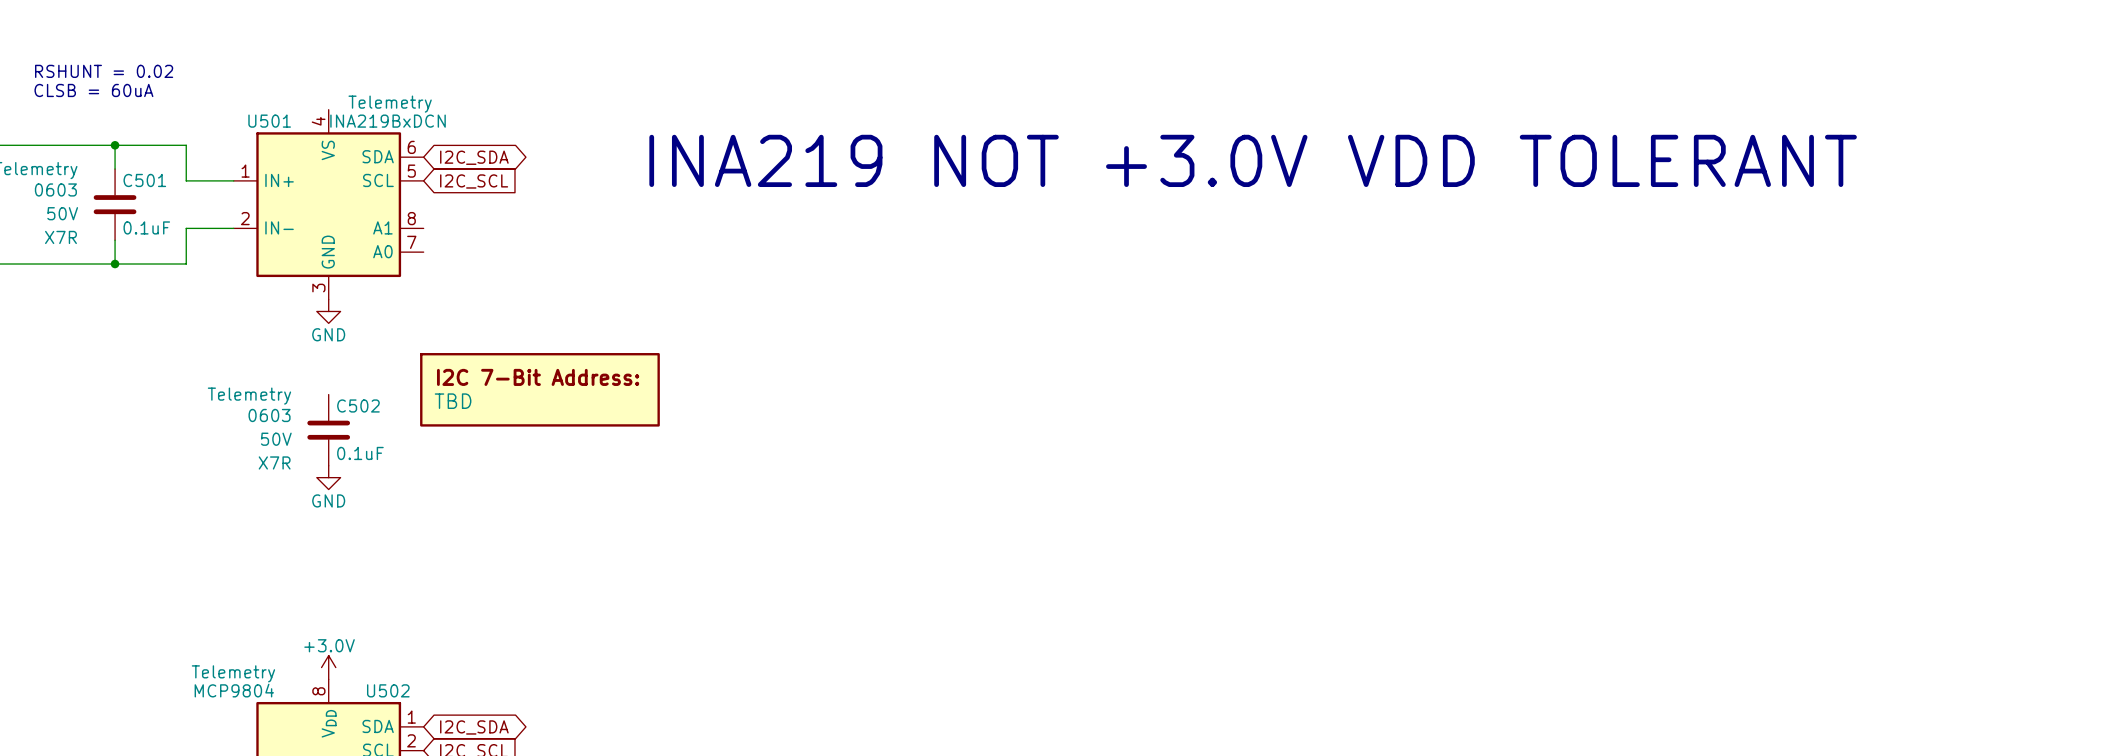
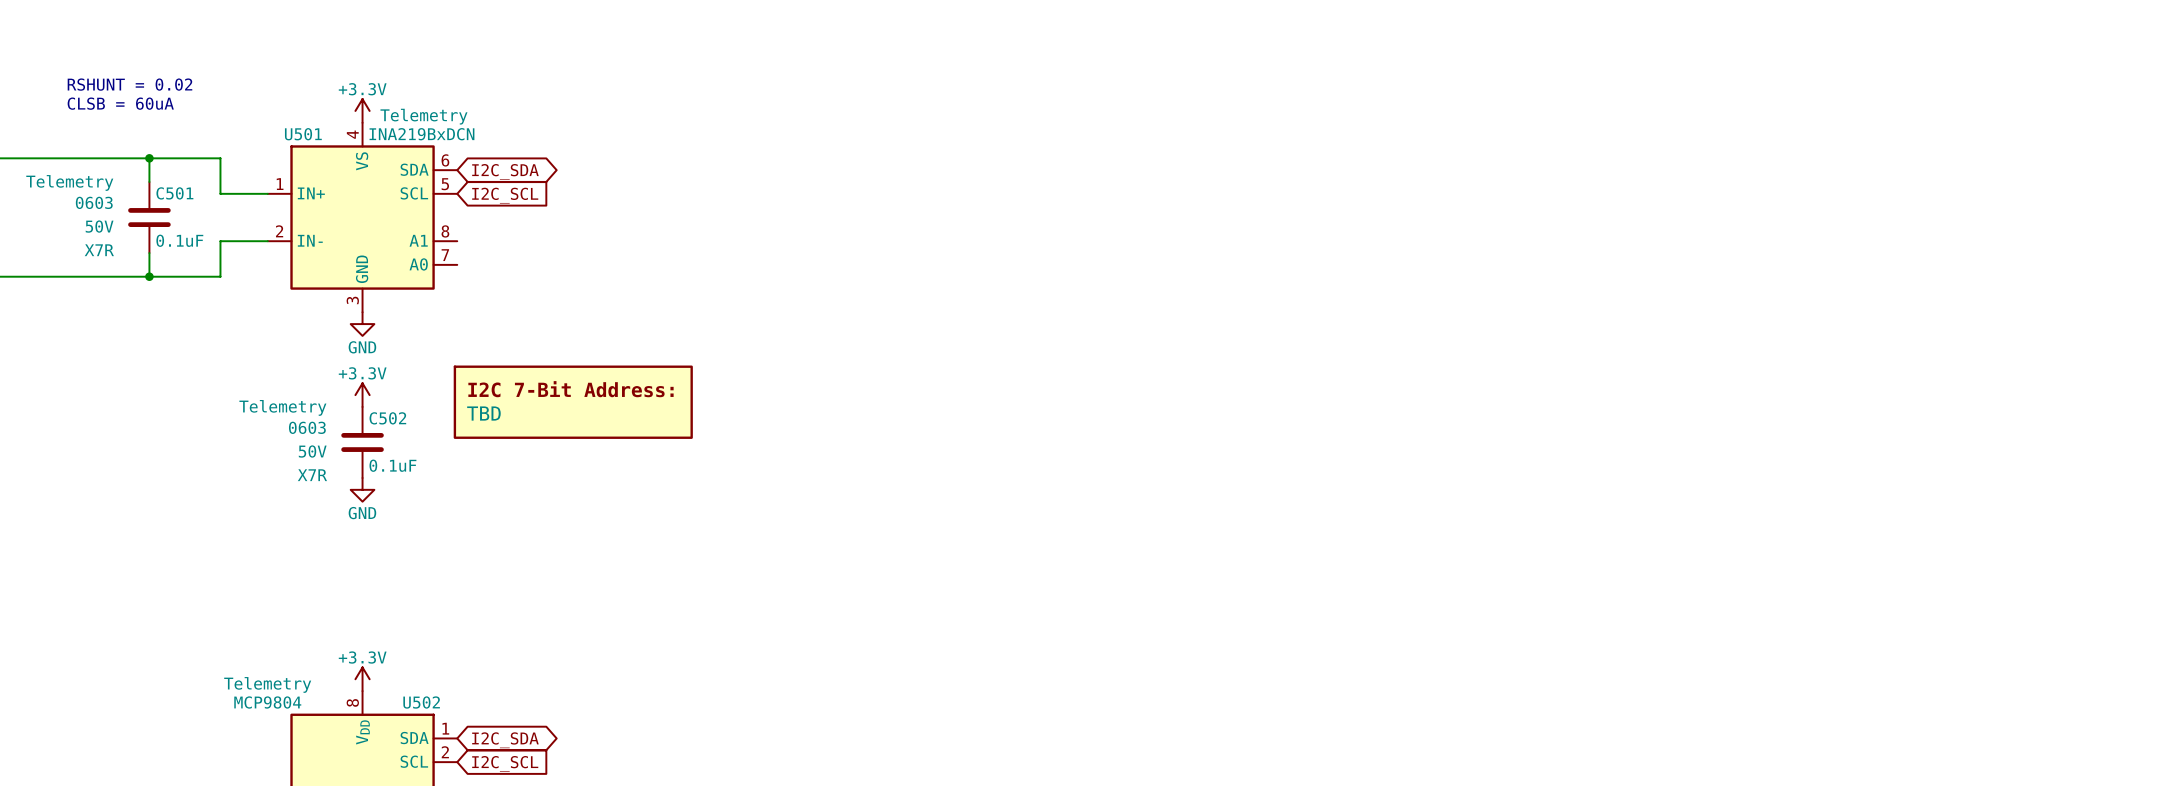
power symbol: none -> +3.3V (362, 110)
text: INA219 NOT +3.0V VDD TOLERANT (1253, 160) -> none
power symbol: none -> +3.3V (362, 395)
power symbol: +3.0V (328, 667) -> +3.3V (362, 679)

